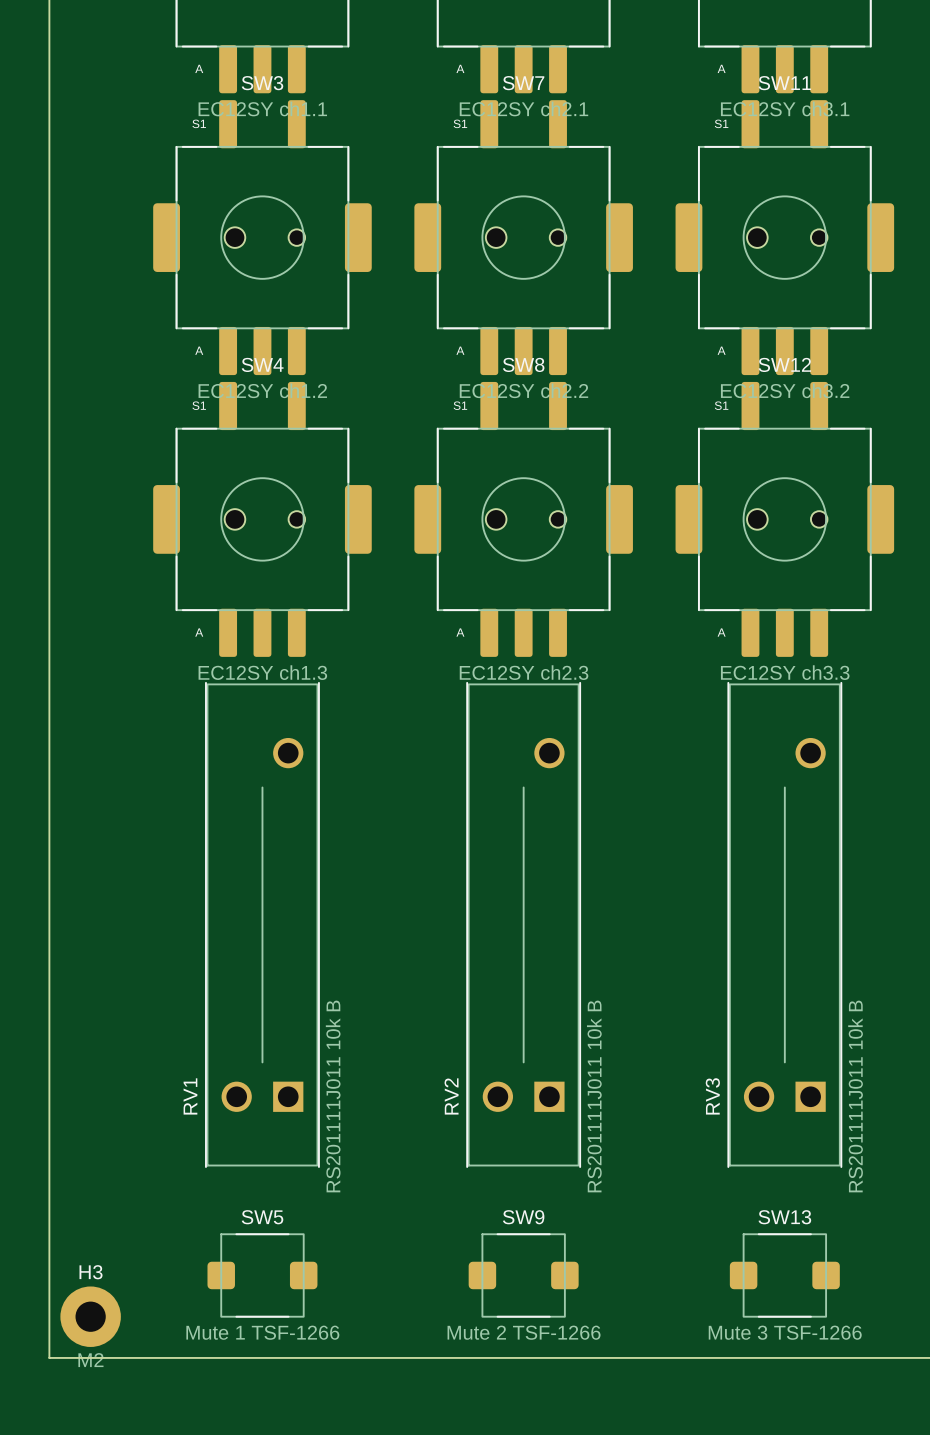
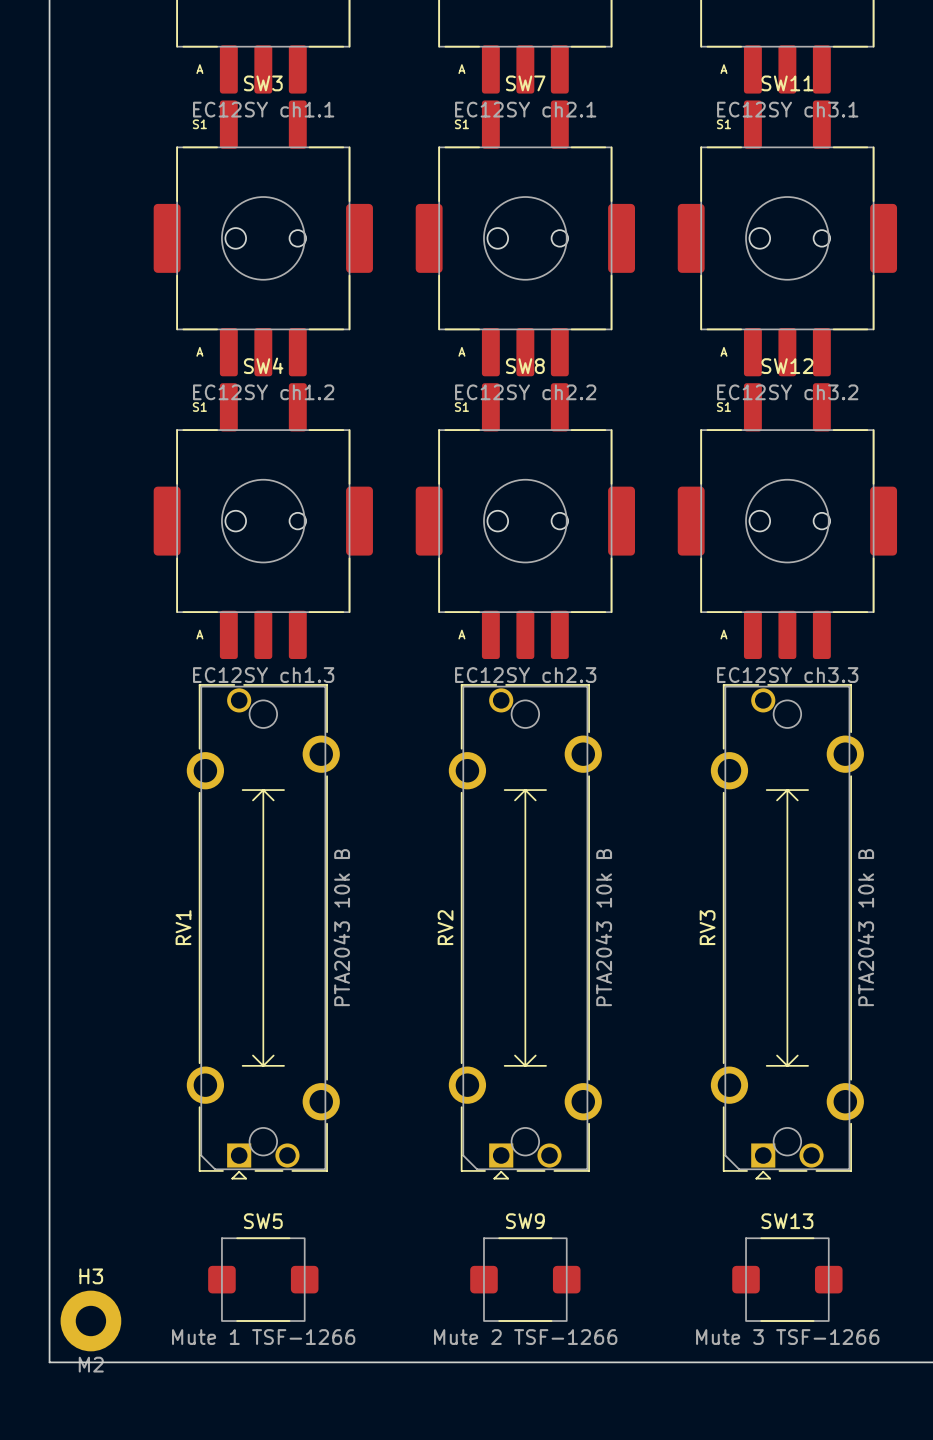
RV1 footprint: [205, 682, 320, 1168] -> [186, 684, 340, 1180]
RV2 footprint: [466, 682, 581, 1168] -> [448, 684, 602, 1180]
RV3 footprint: [727, 682, 843, 1168] -> [710, 684, 864, 1180]
RV1 name position: RV1 (190, 1096) -> RV1 (183, 927)
RV1 value: RS201111J011 10k B (333, 1096) -> PTA2043 10k B (341, 927)
RV2 name position: RV2 (451, 1096) -> RV2 (445, 927)
RV2 value: RS201111J011 10k B (594, 1096) -> PTA2043 10k B (603, 927)
RV3 name position: RV3 (712, 1096) -> RV3 (707, 927)
RV3 value: RS201111J011 10k B (855, 1096) -> PTA2043 10k B (865, 927)

